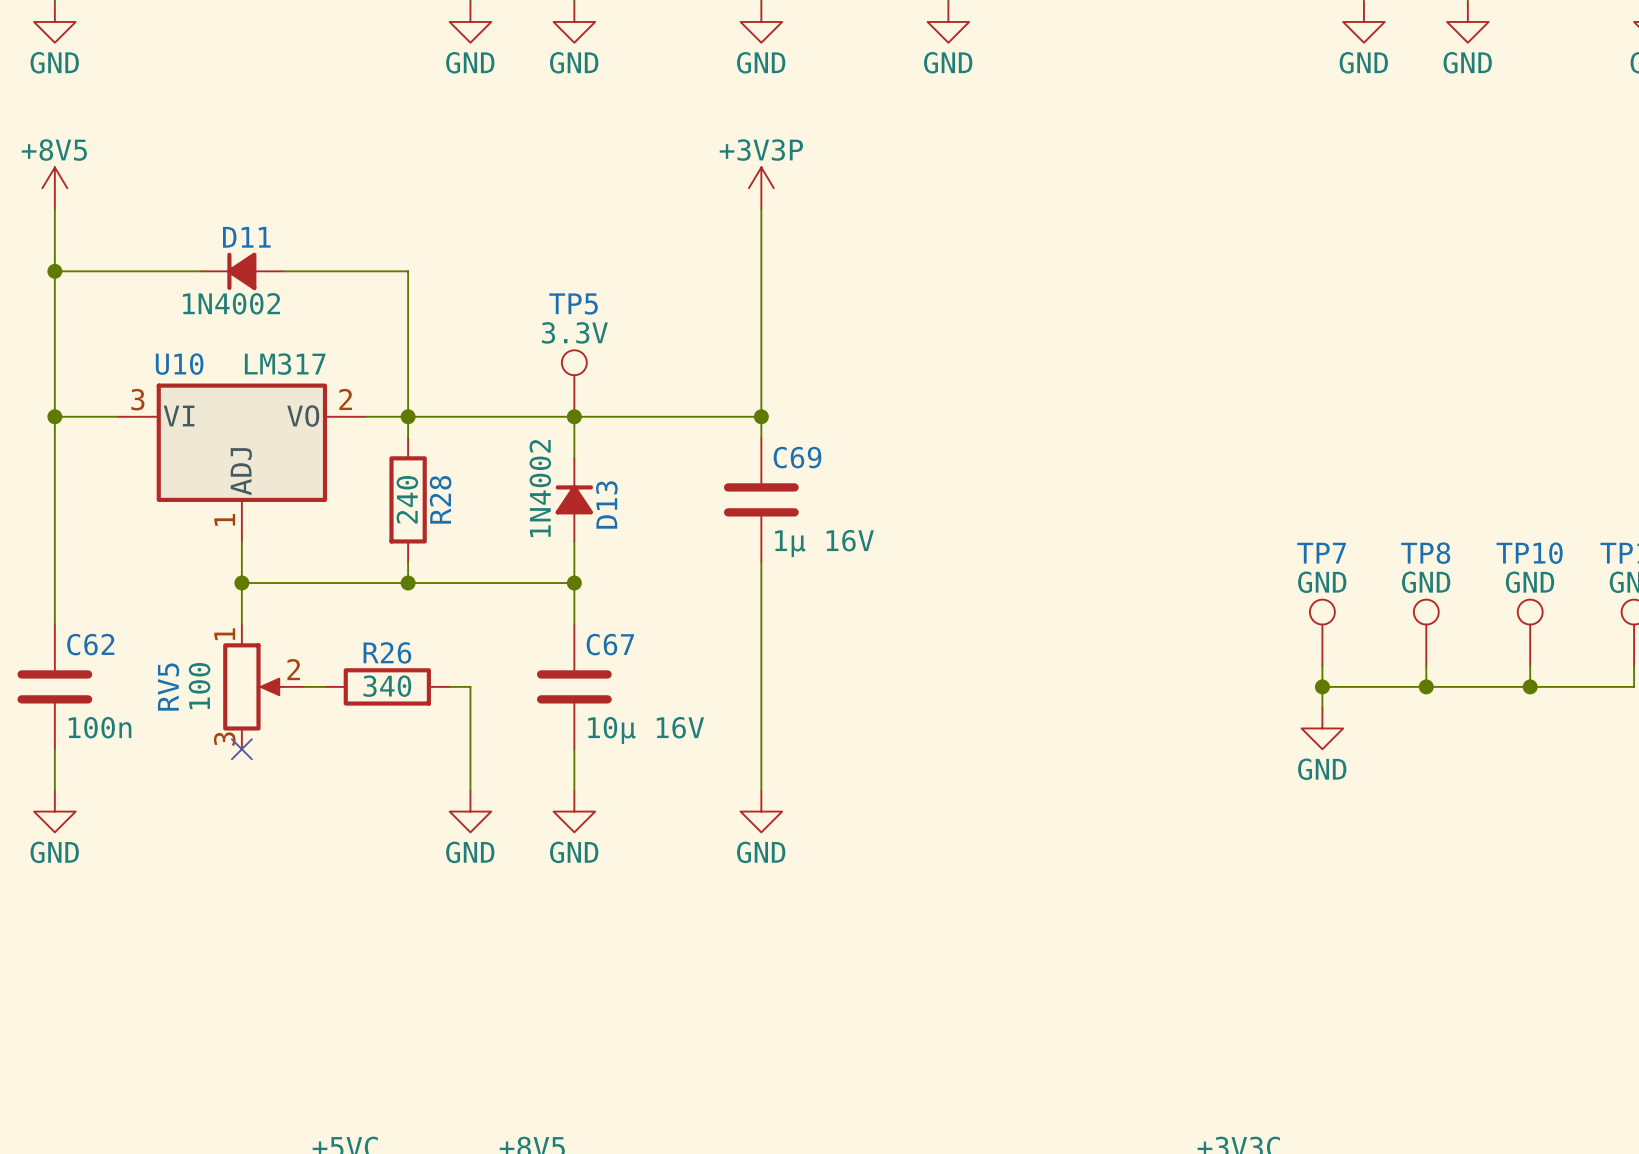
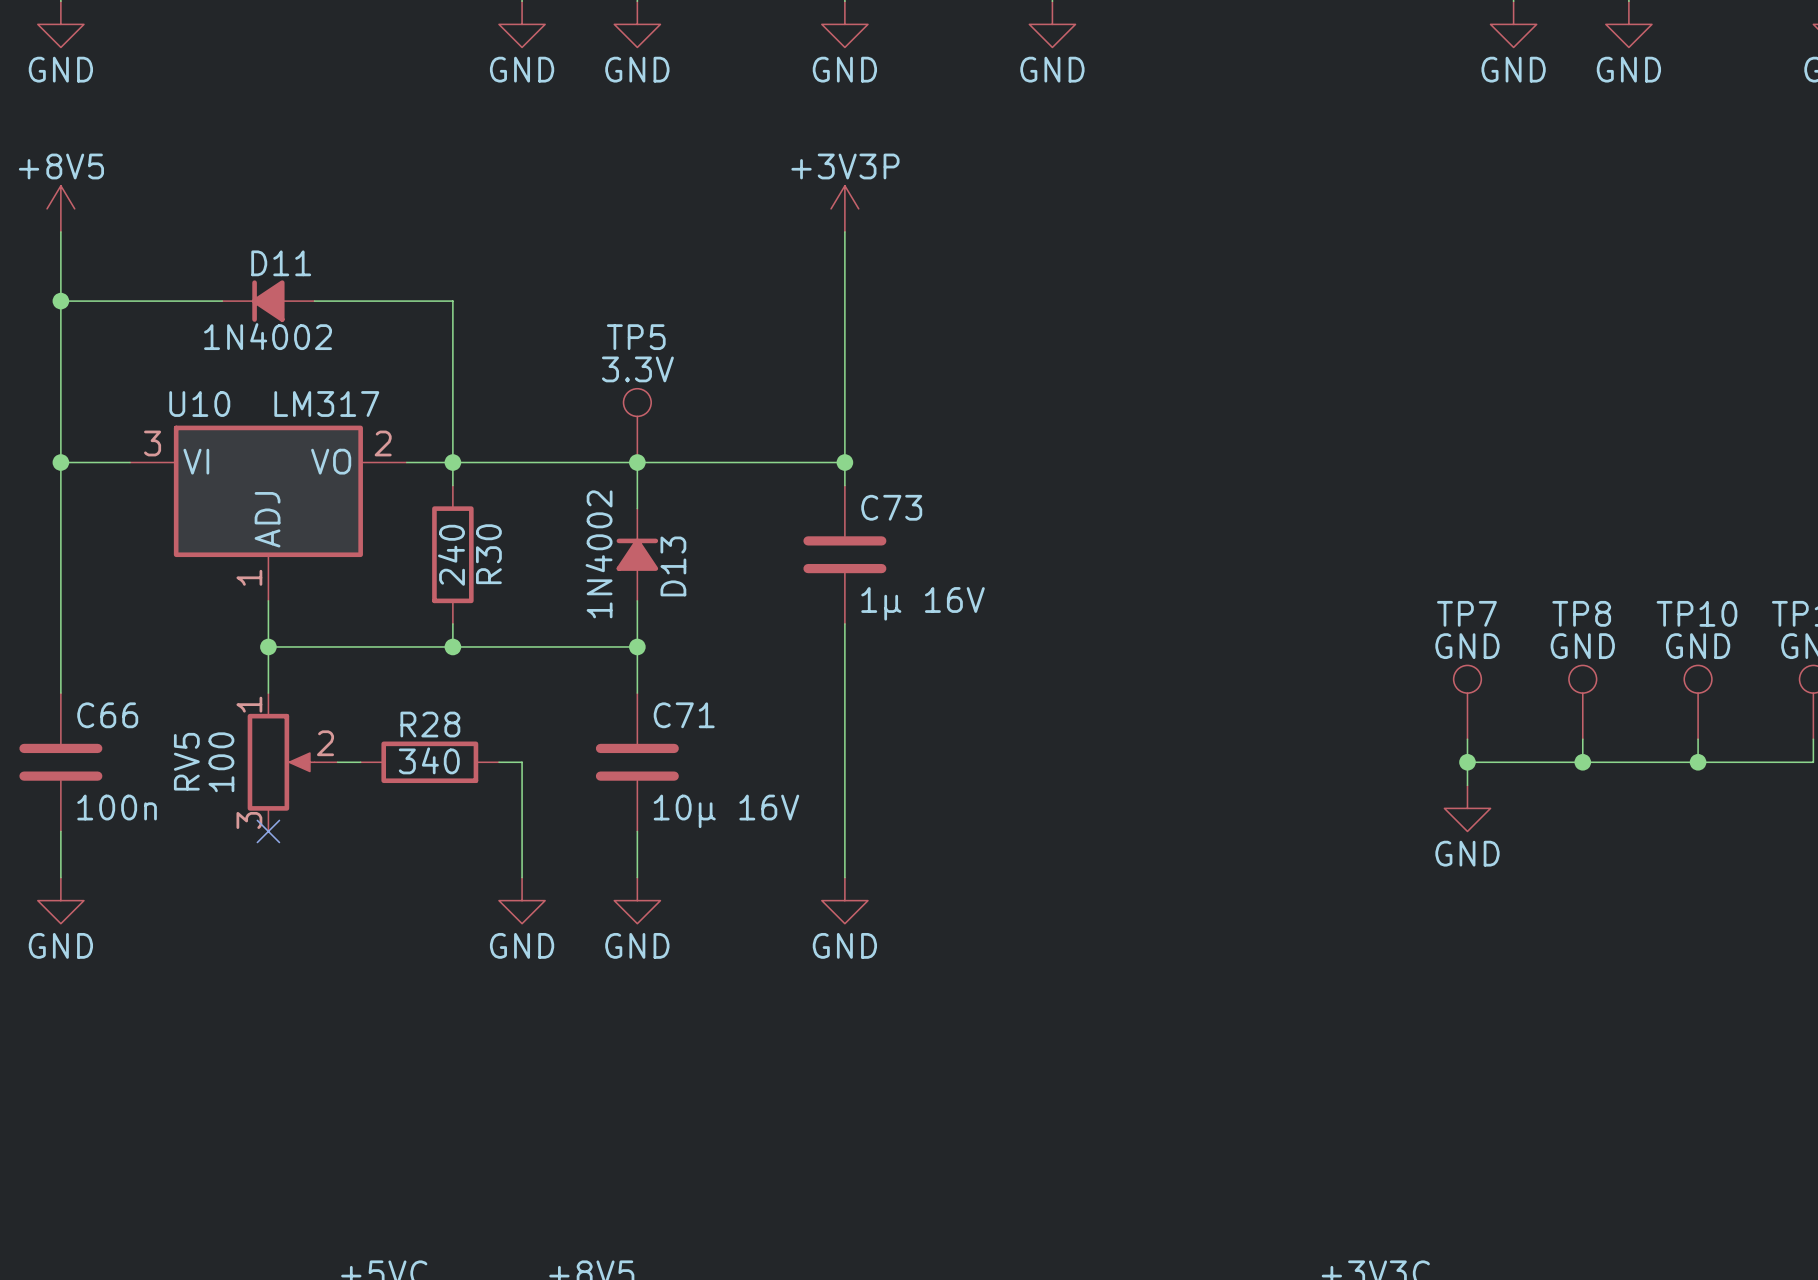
C69 name: C69 (797, 457) -> C73 (891, 507)
R28 name: R28 (440, 499) -> R30 (488, 554)
C62 name: C62 (90, 644) -> C66 (107, 715)
C67 name: C67 (610, 644) -> C71 (684, 715)
R26 name: R26 (387, 652) -> R28 (430, 724)

